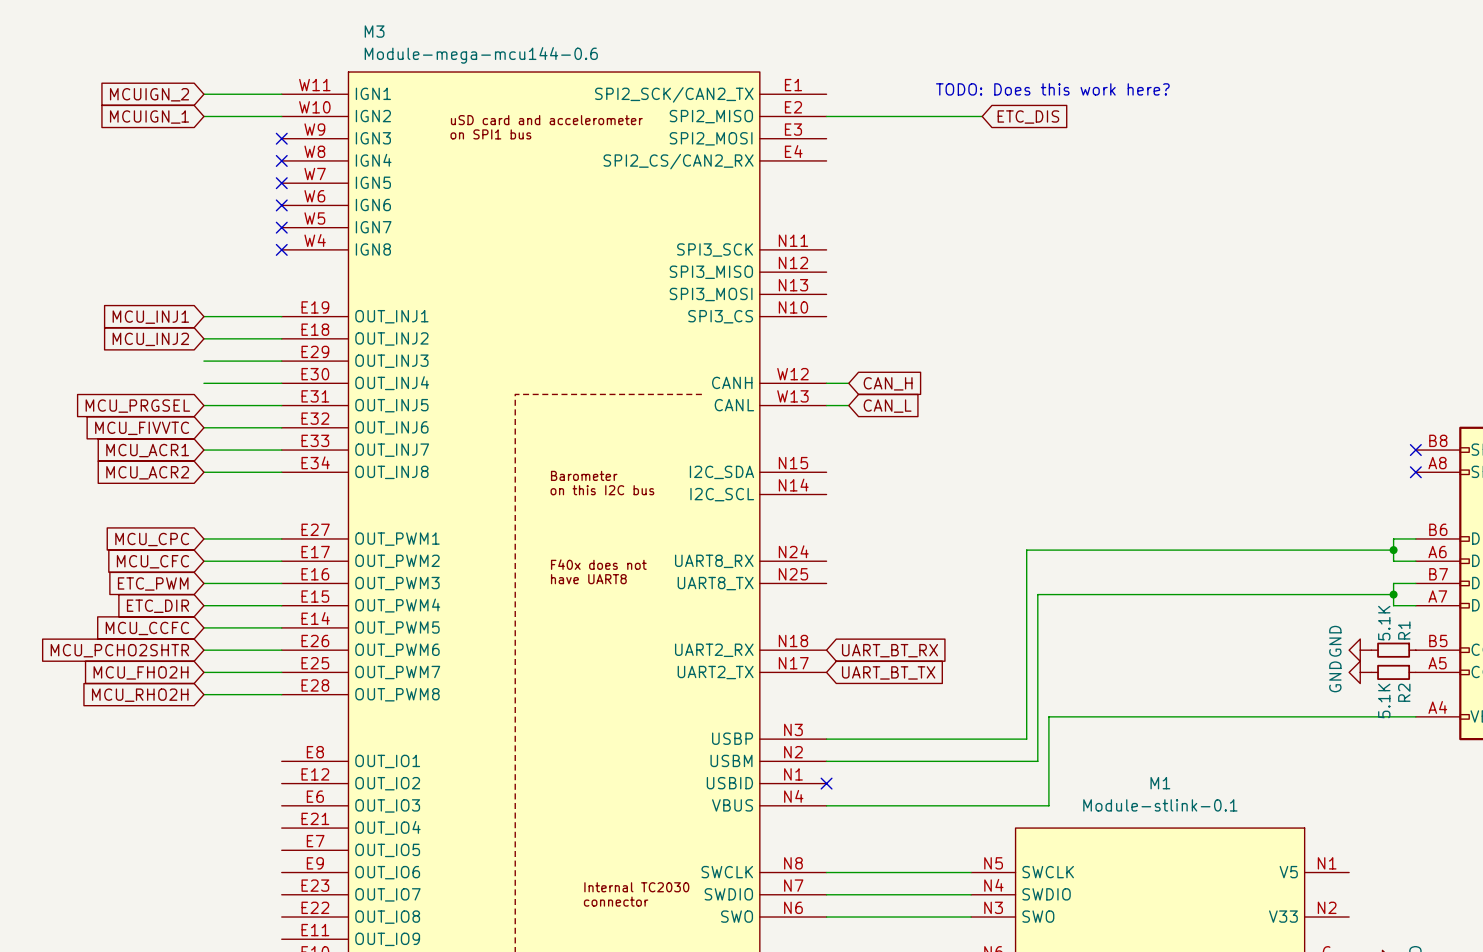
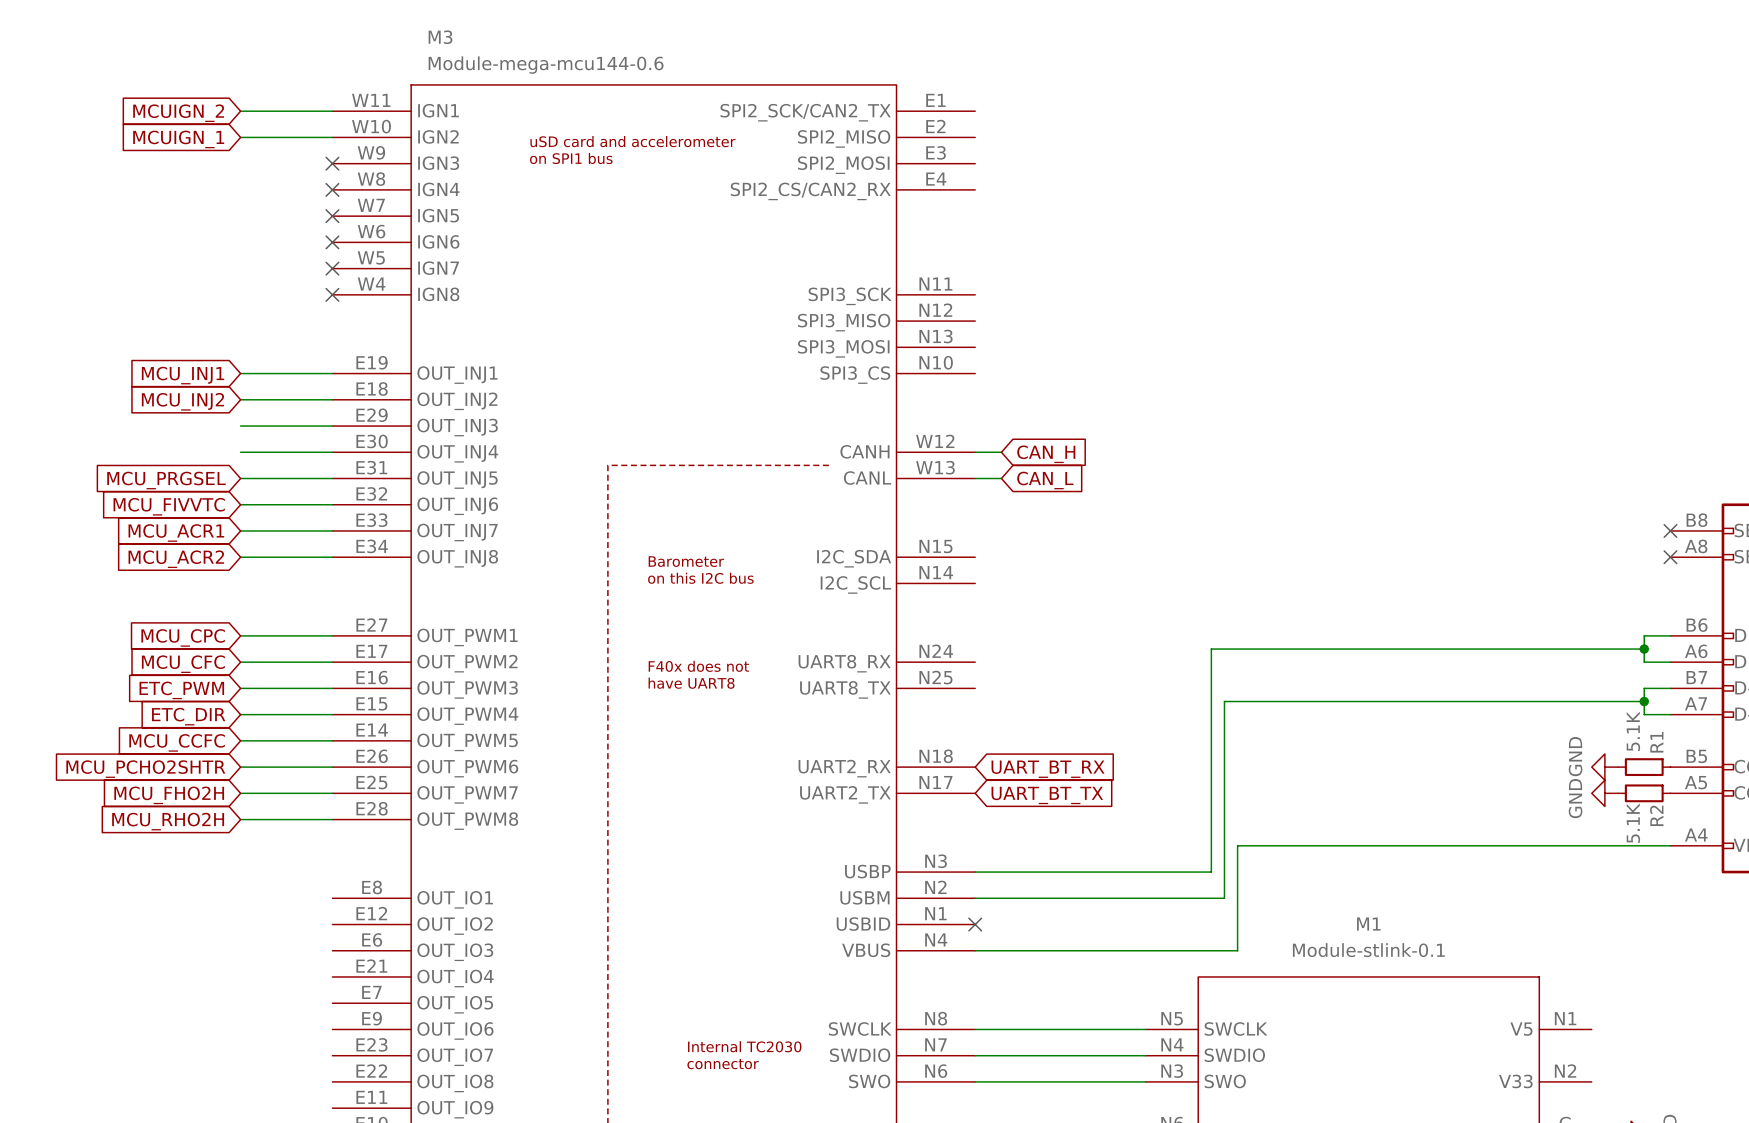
text: TODO: Does this work here? (1052, 89) -> none
wire: (826, 116) (982, 116) -> none
global label: ETC_DIS (1028, 117) -> none

